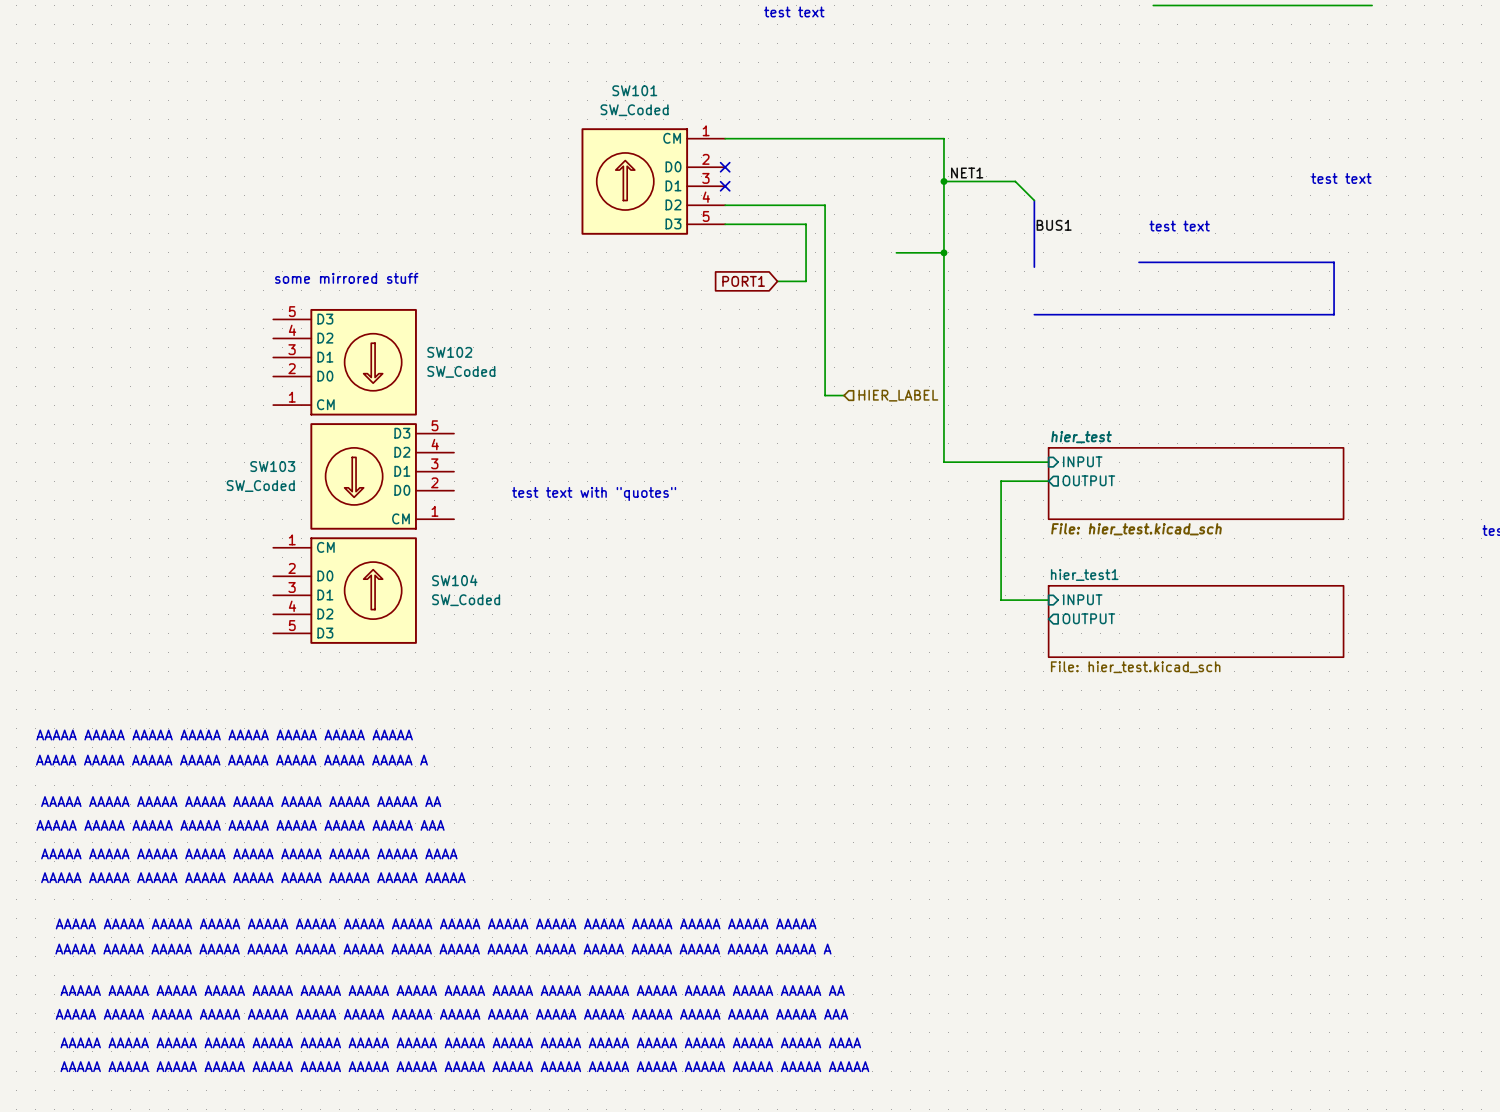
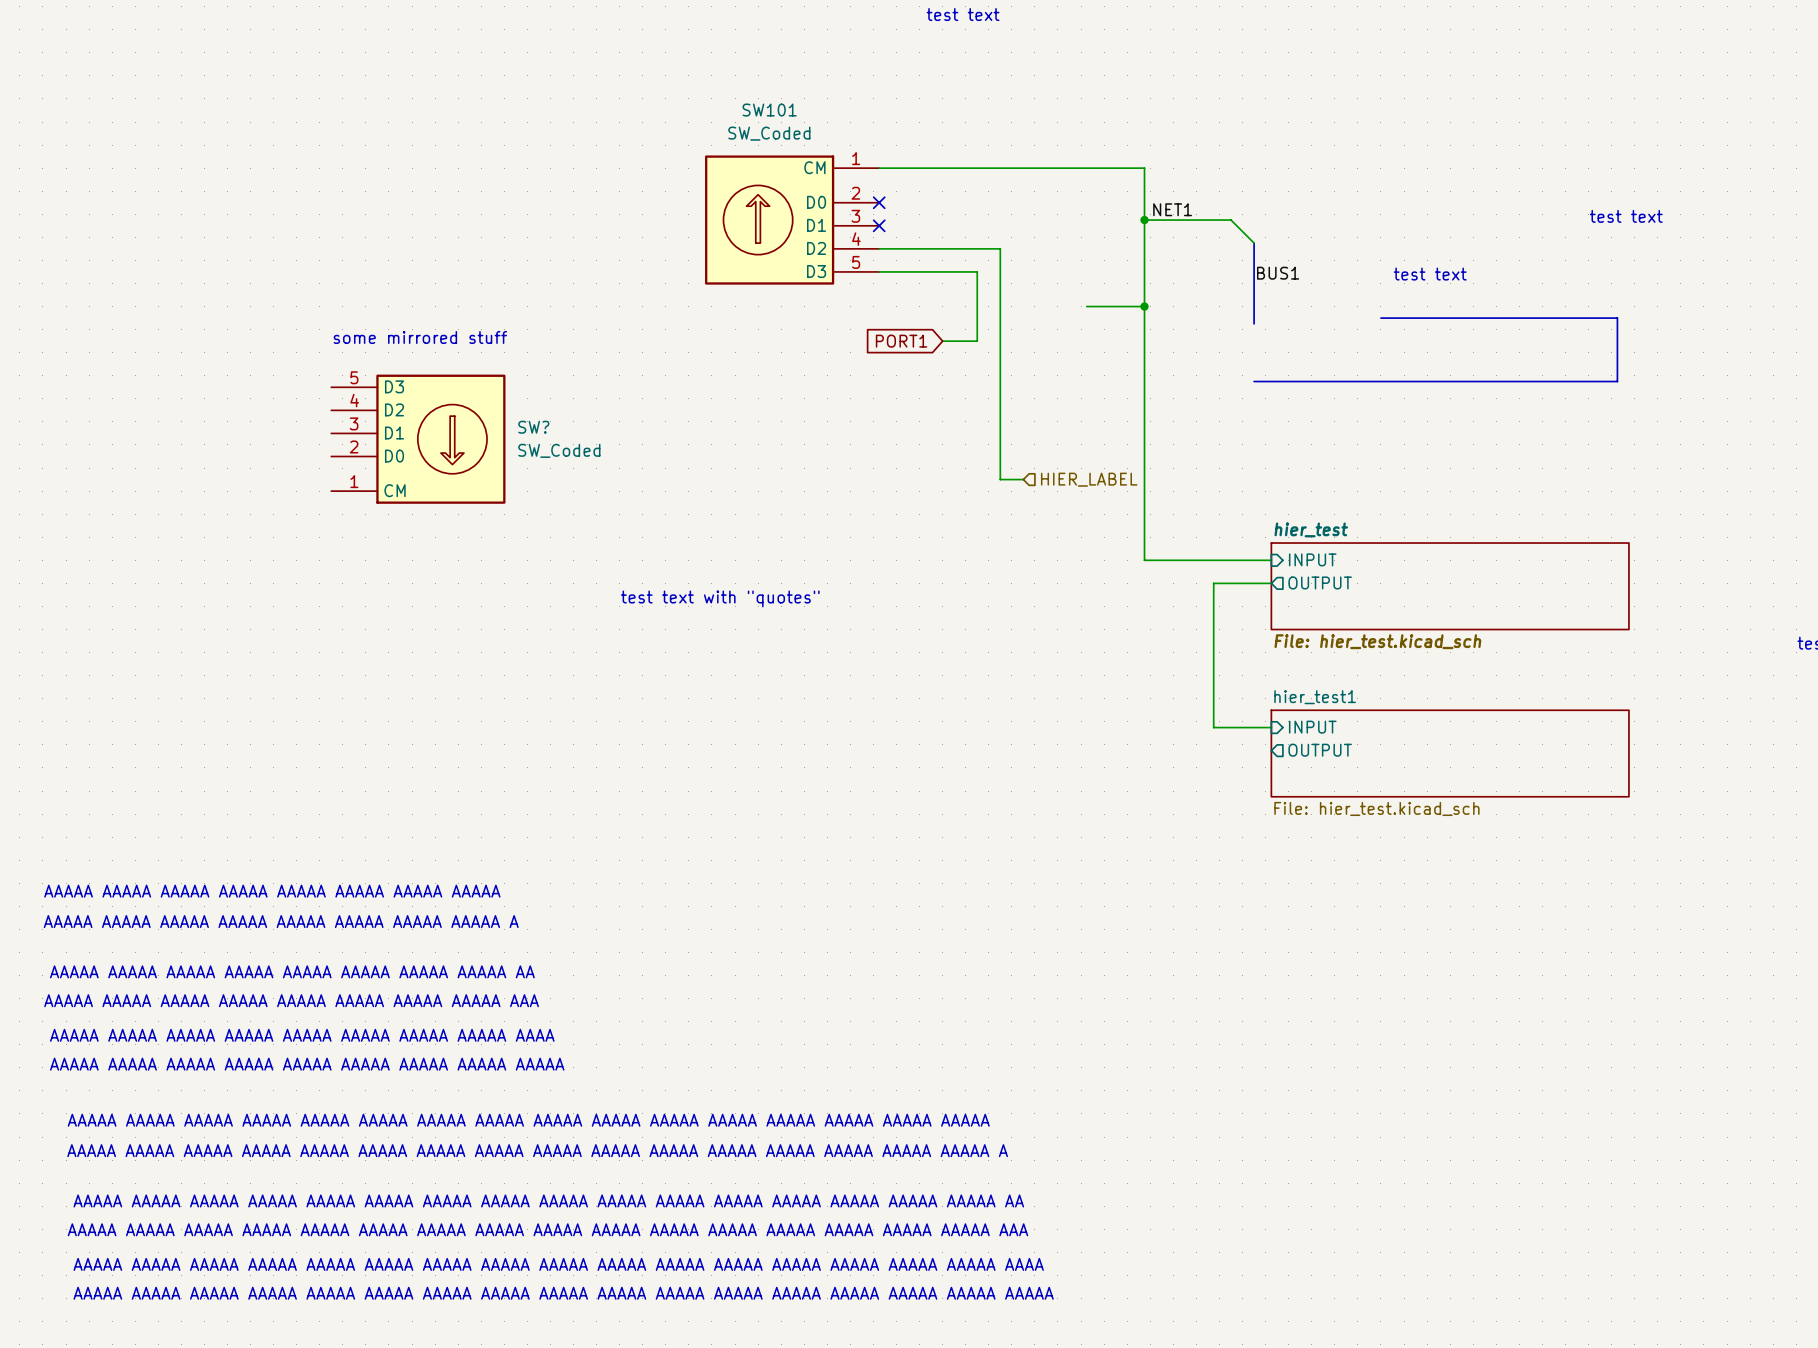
wire: (1153, 5) (1372, 5) -> none
SW102 name: SW102 (449, 352) -> SW? (533, 427)
SW103: SW_Coded (382, 476) -> none
SW104: SW_Coded (345, 590) -> none

